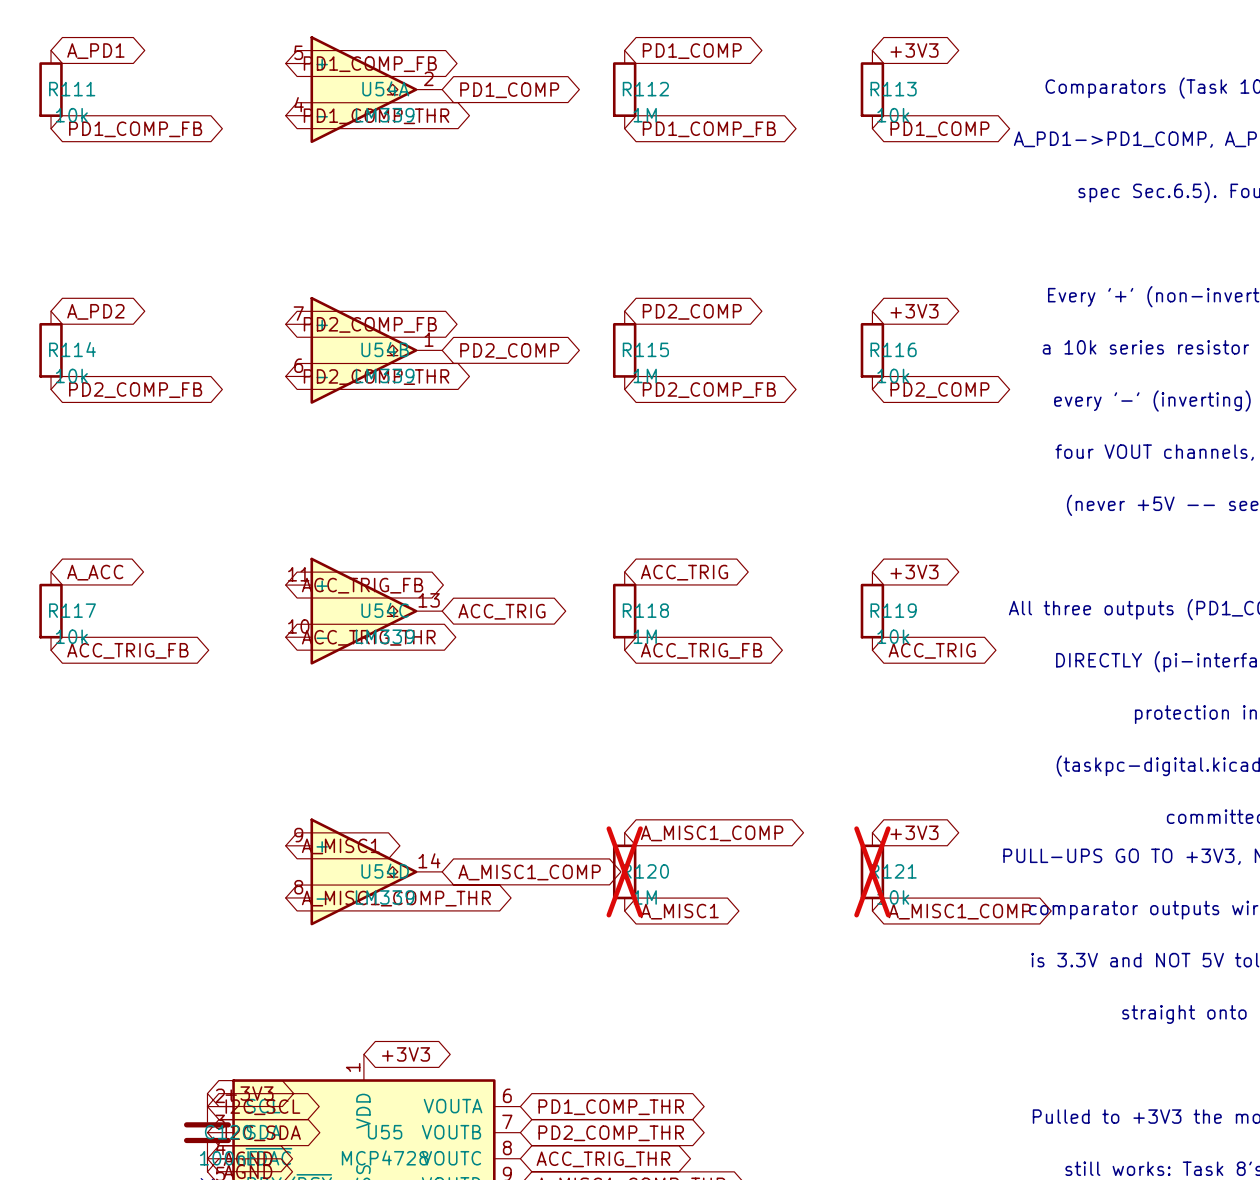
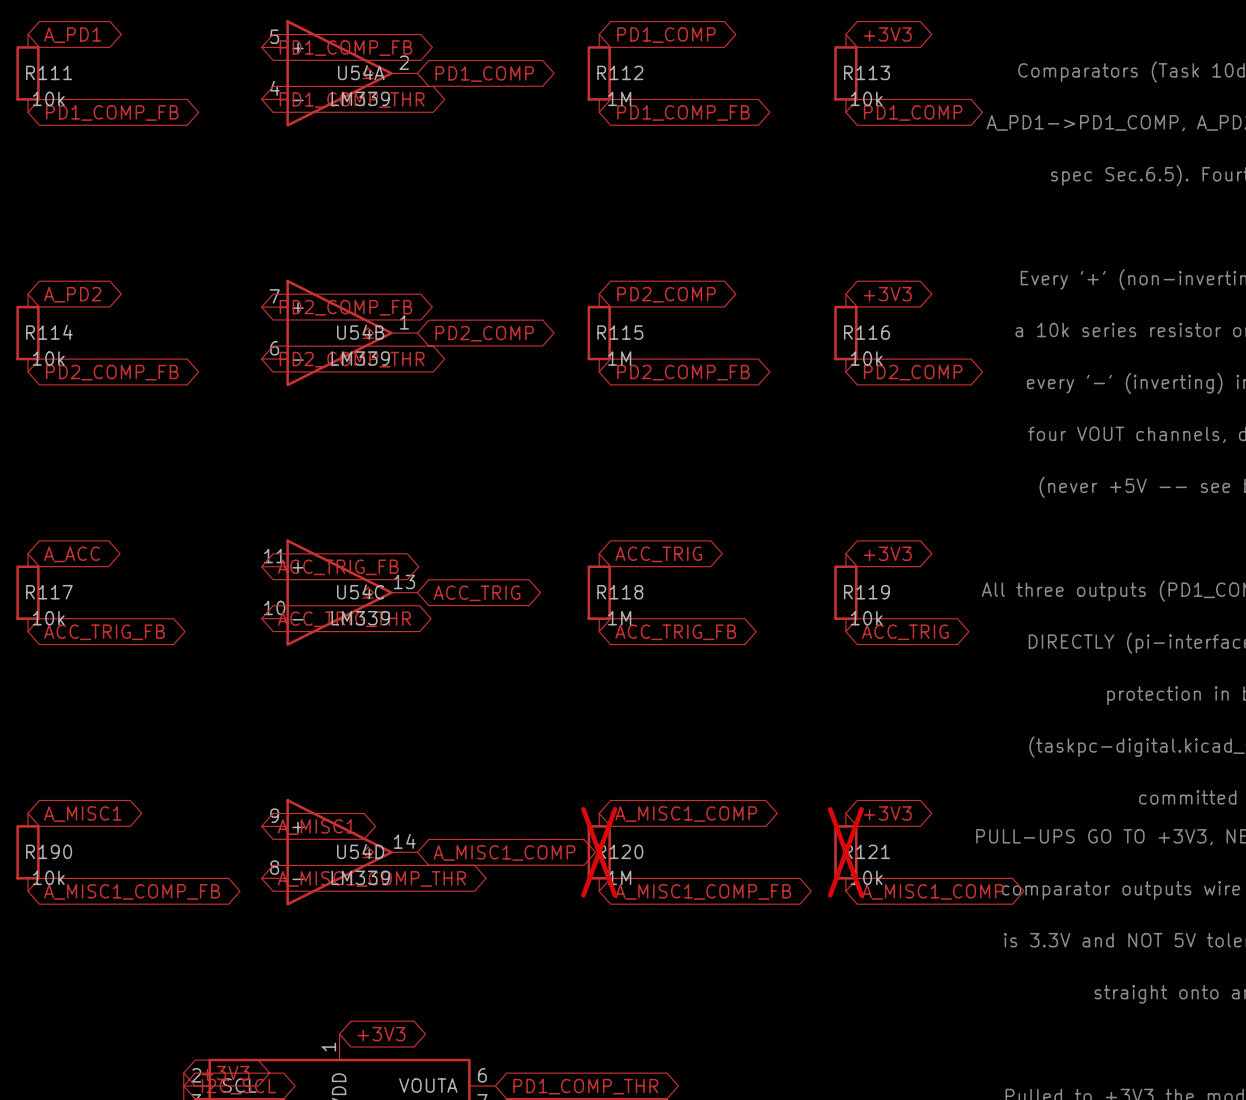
global label: none -> A_MISC1 (82, 814)
R190: none -> 10k (28, 852)
global label: none -> A_MISC1_COMP_FB (132, 891)
global label: A_MISC1 (679, 911) -> A_MISC1_COMP_FB (703, 891)

